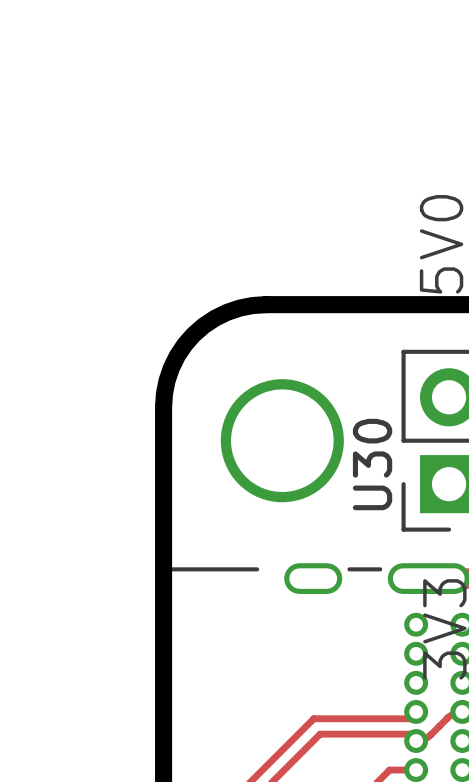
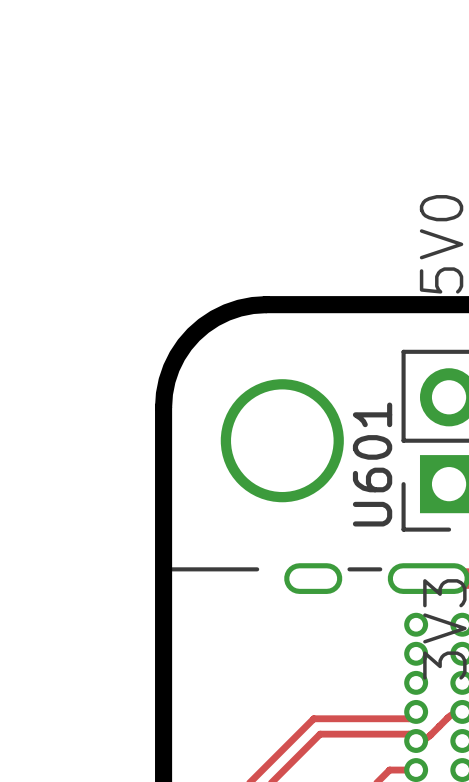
U30 name: U30 (372, 464) -> U601 (372, 464)

